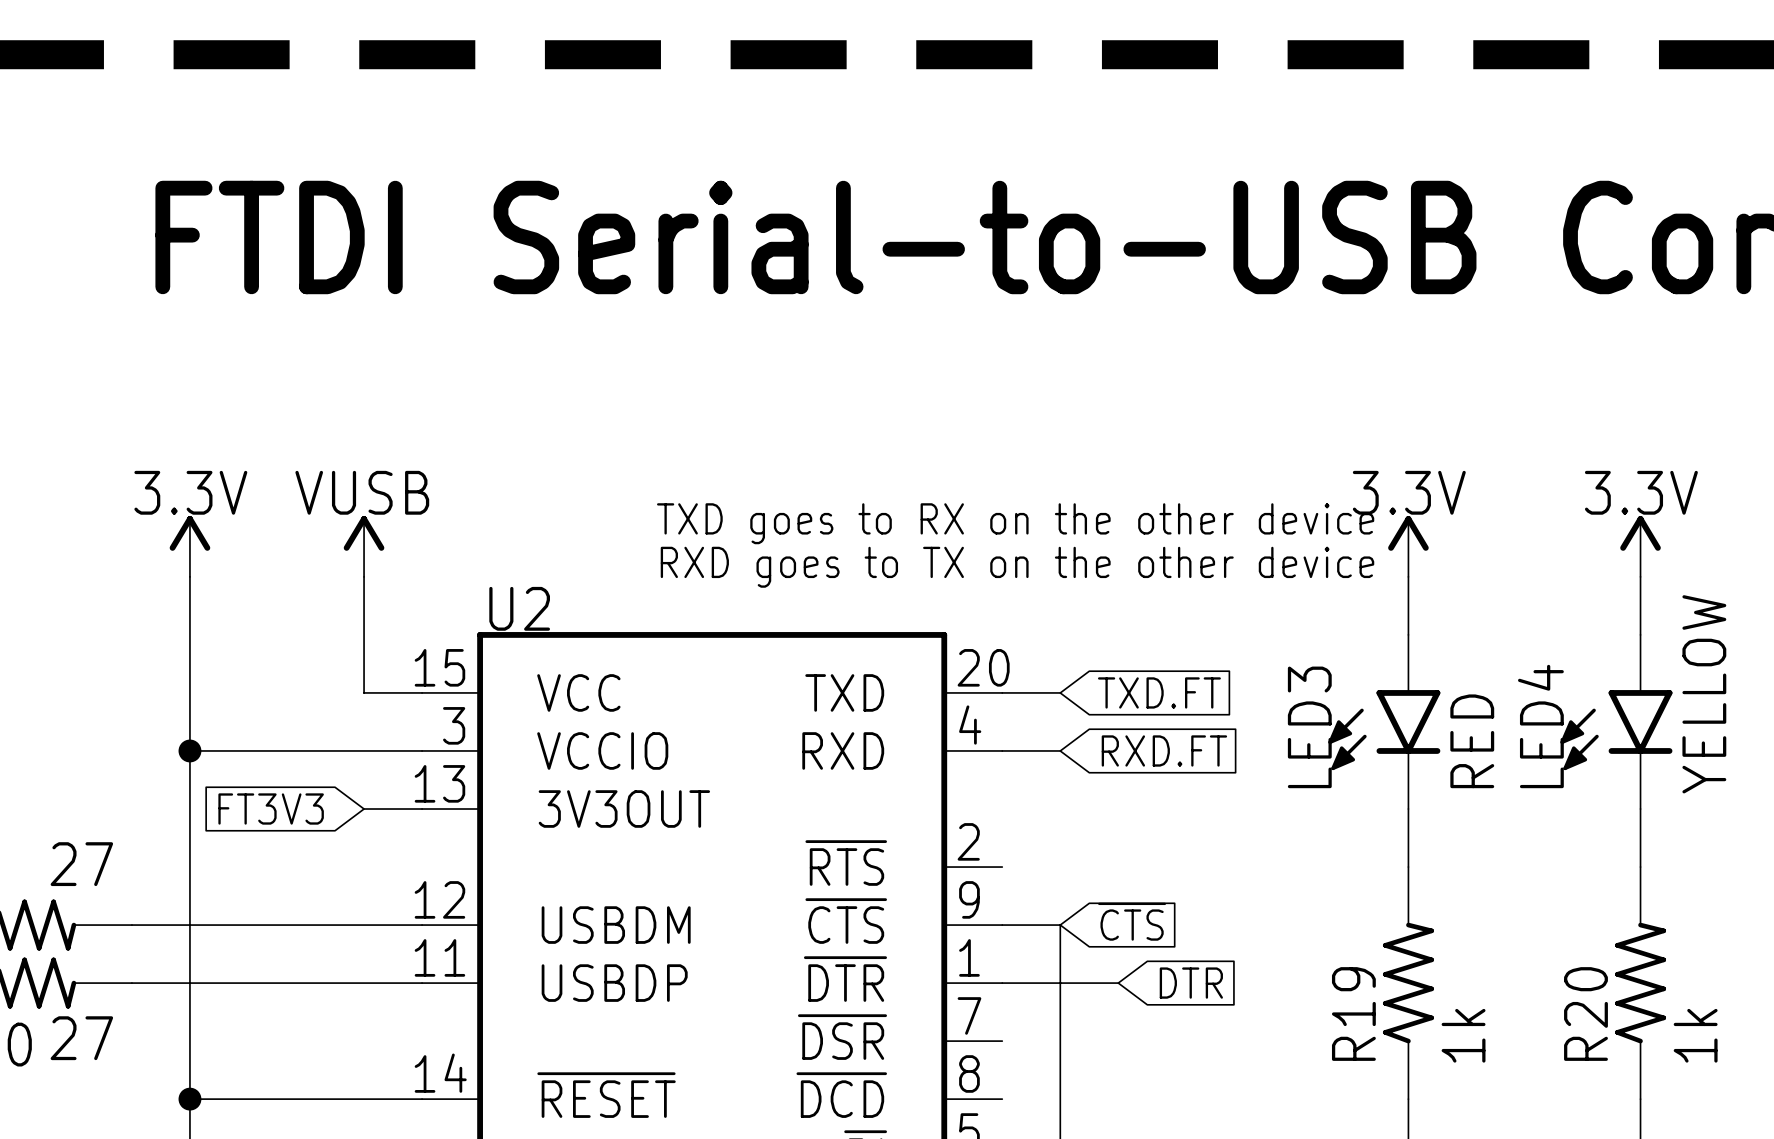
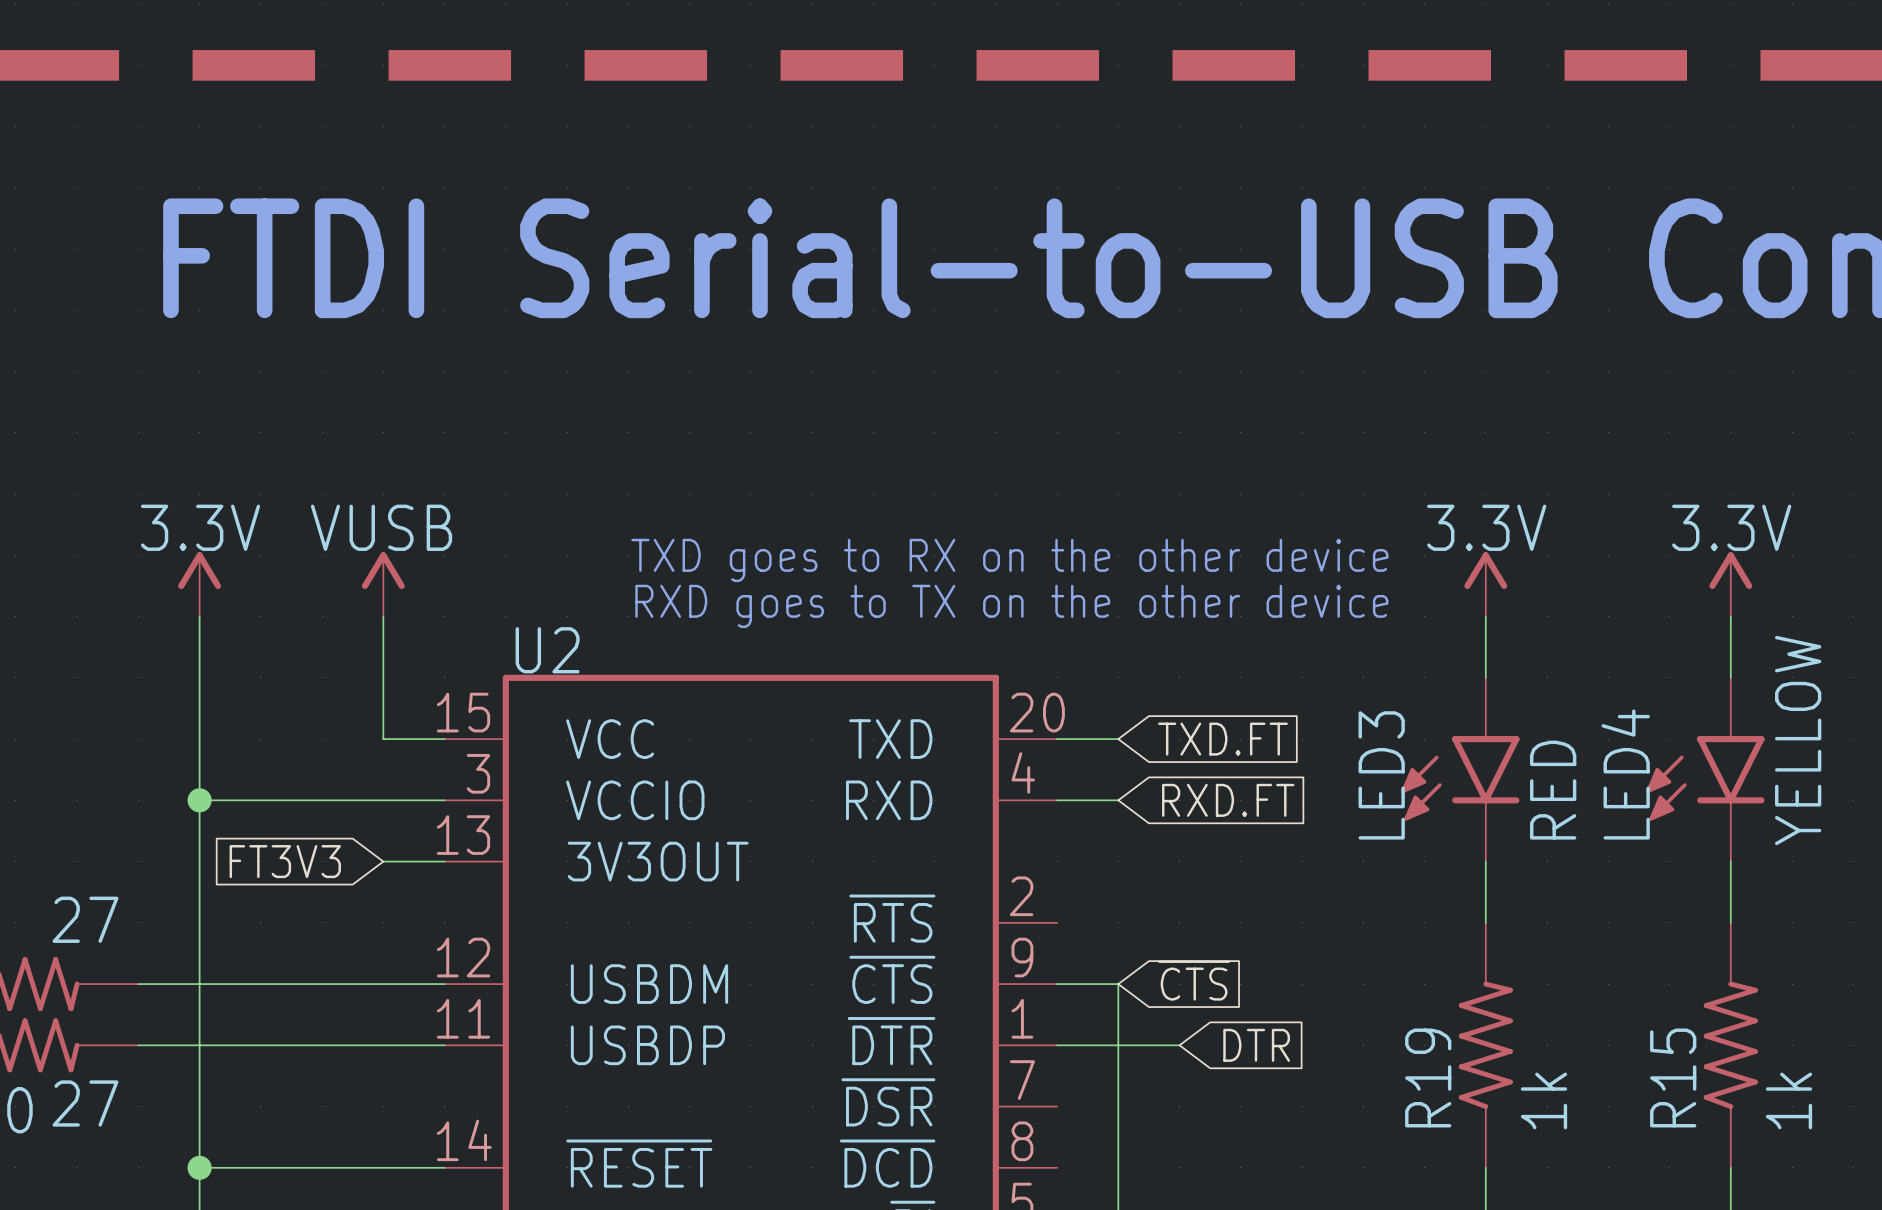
text position: TXD goes to RX on the other device (1015, 523) -> TXD goes to RX on the other device (1009, 560)
text position: RXD goes to TX on the other device (1017, 567) -> RXD goes to TX on the other device (1011, 606)
R20 name: R20 (1585, 1014) -> R15 (1673, 1077)

